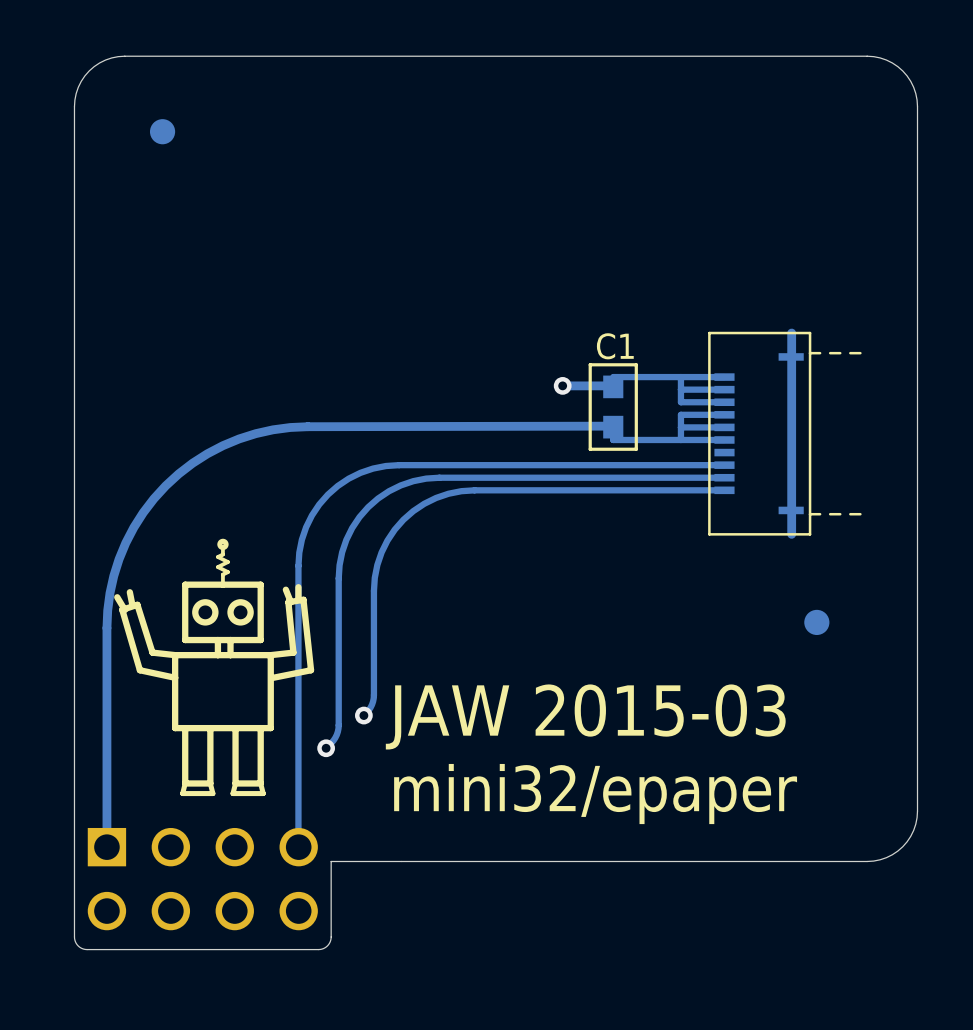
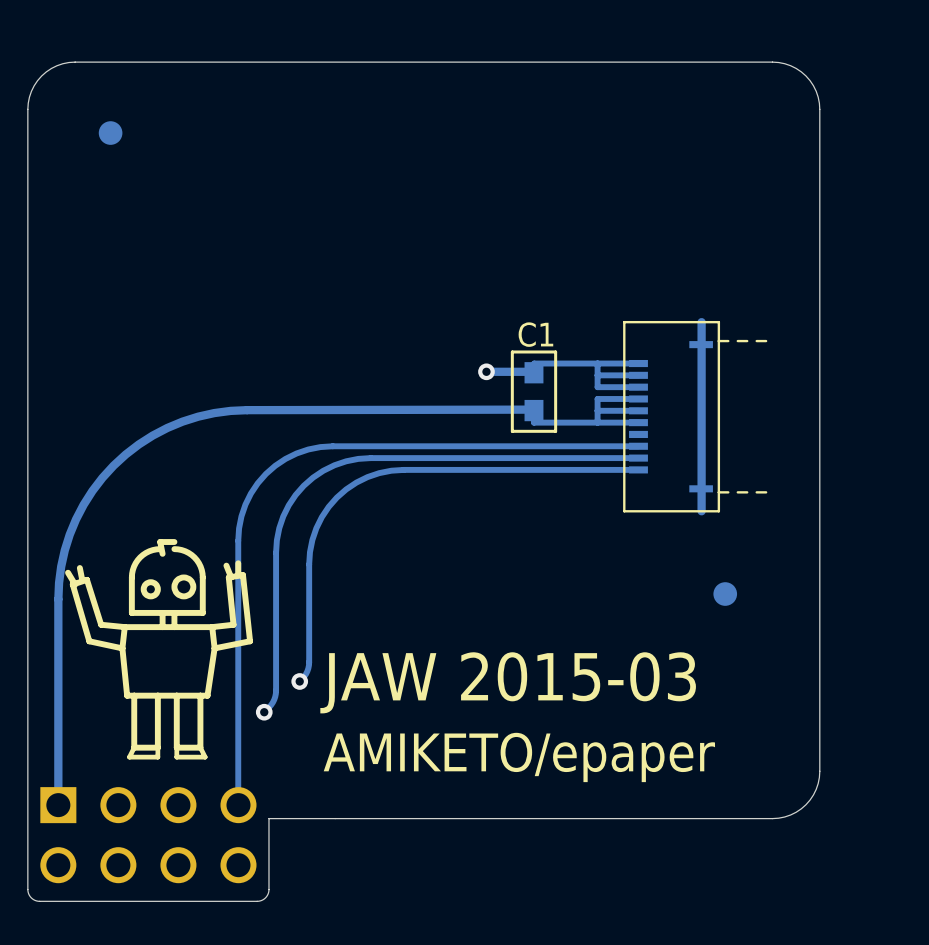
drawing shape: [114, 538, 315, 797] -> [65, 539, 254, 760]
text: mini32/epaper (595, 794) -> AMIKETO/epaper (519, 757)

